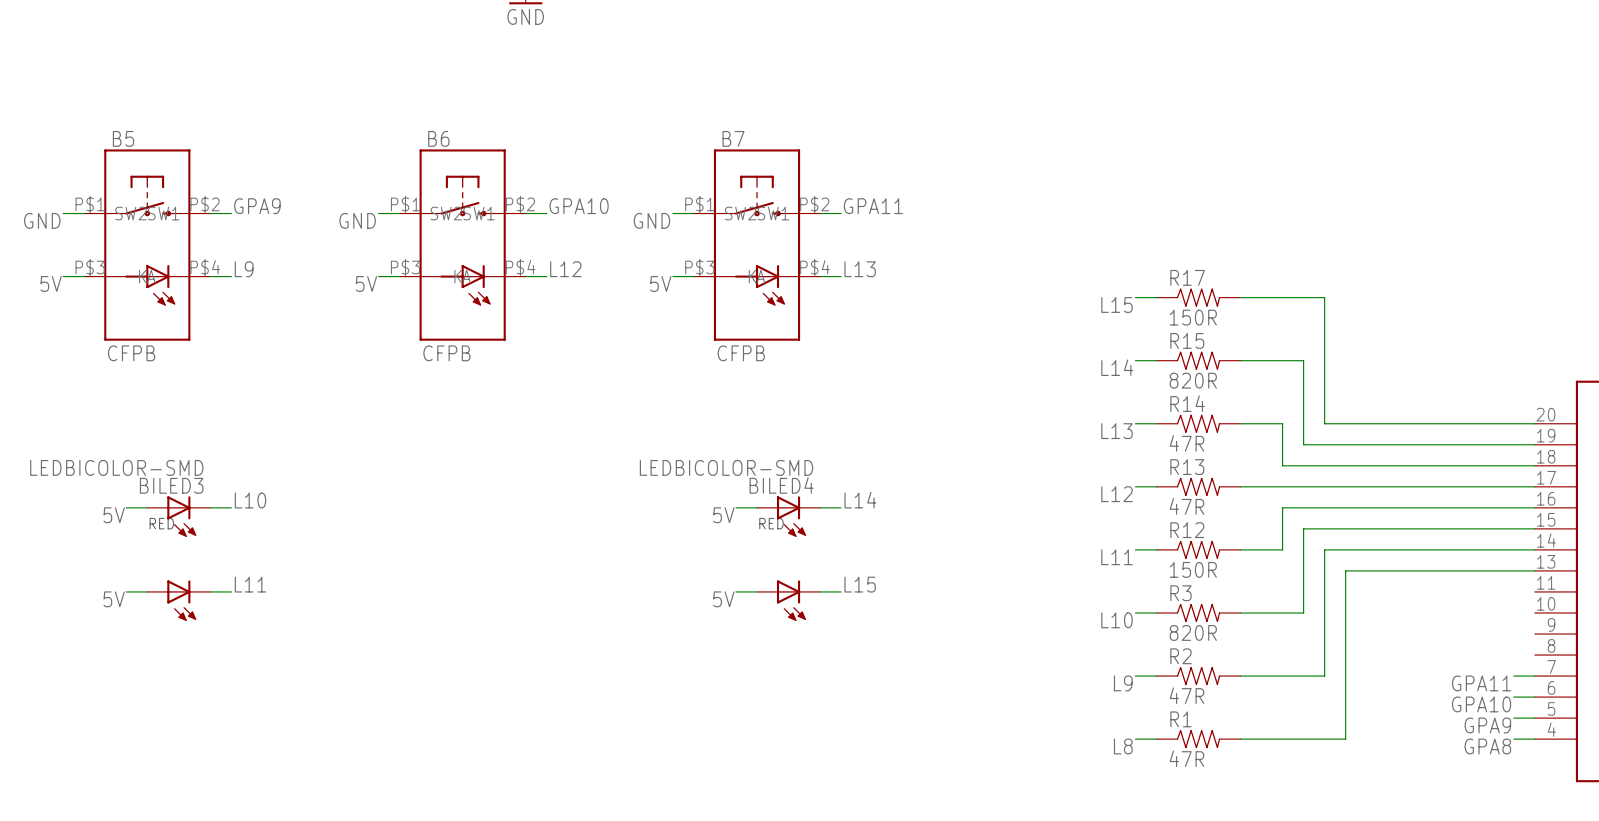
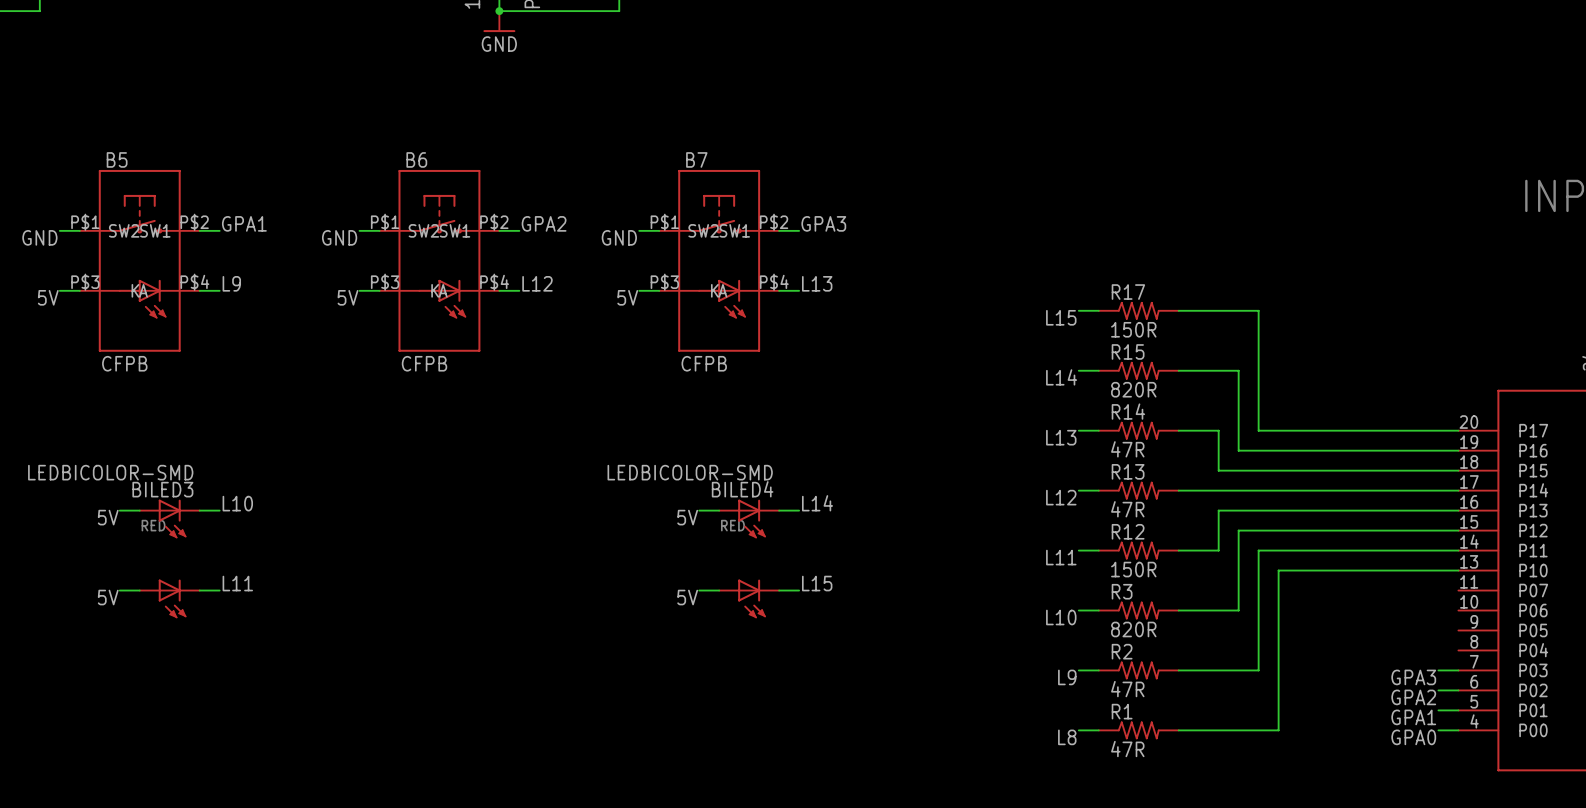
label: GPA9 (257, 206) -> GPA1 (244, 223)
label: GPA10 (579, 206) -> GPA2 (544, 223)
label: GPA11 (873, 206) -> GPA3 (823, 223)
label: GPA11 (1481, 683) -> GPA3 (1413, 677)
label: GPA10 (1481, 704) -> GPA2 (1413, 697)
label: GPA9 (1487, 725) -> GPA1 (1413, 717)
label: GPA8 (1487, 746) -> GPA0 (1413, 737)

